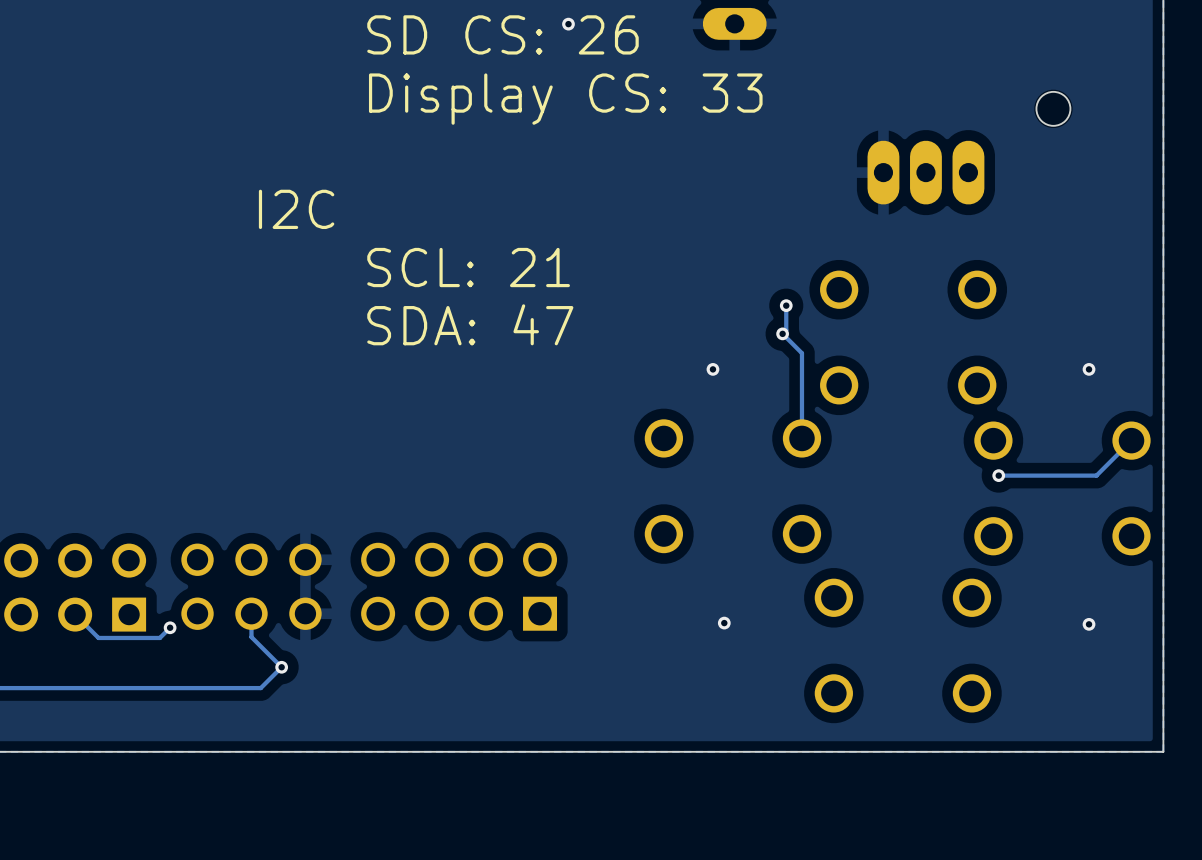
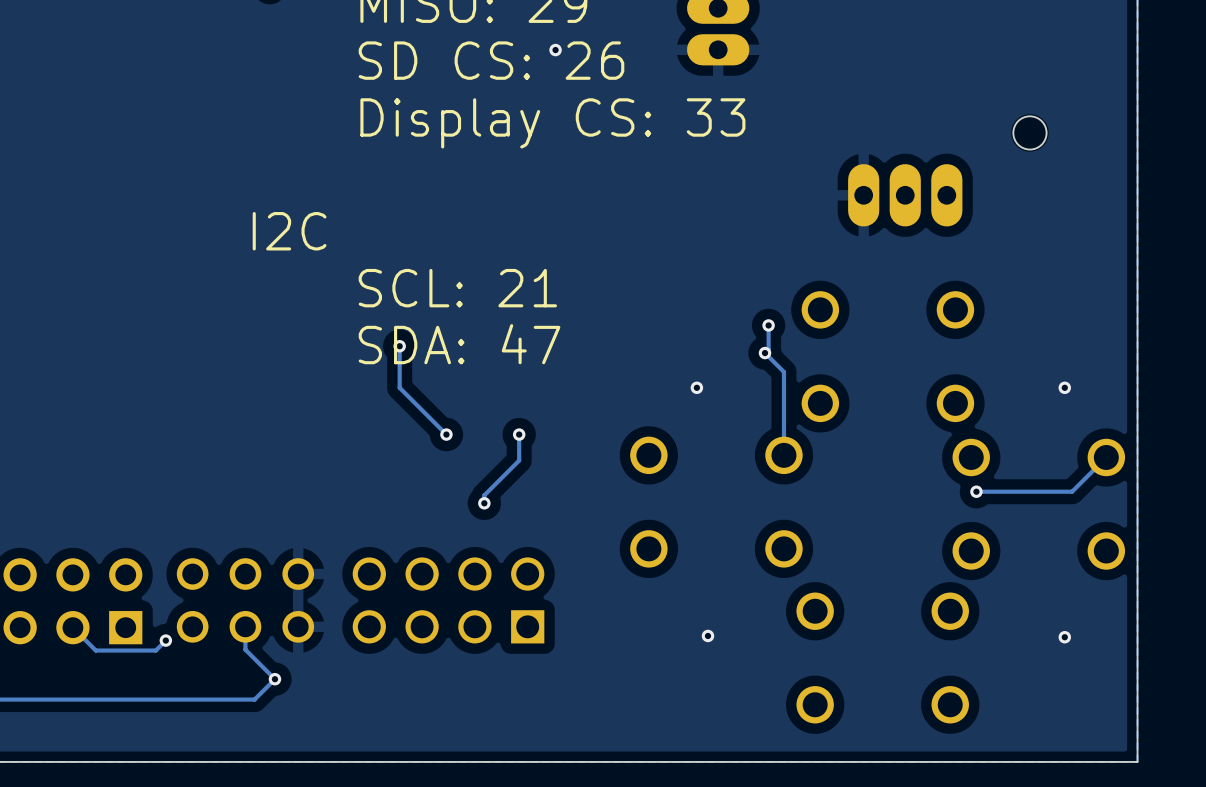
track: none -> (399, 346) (399, 387) (446, 434)
via: none -> (399, 346)
via: none -> (446, 434)
track: none -> (519, 434) (519, 460) (484, 495) (484, 503)
via: none -> (519, 434)
via: none -> (484, 503)

